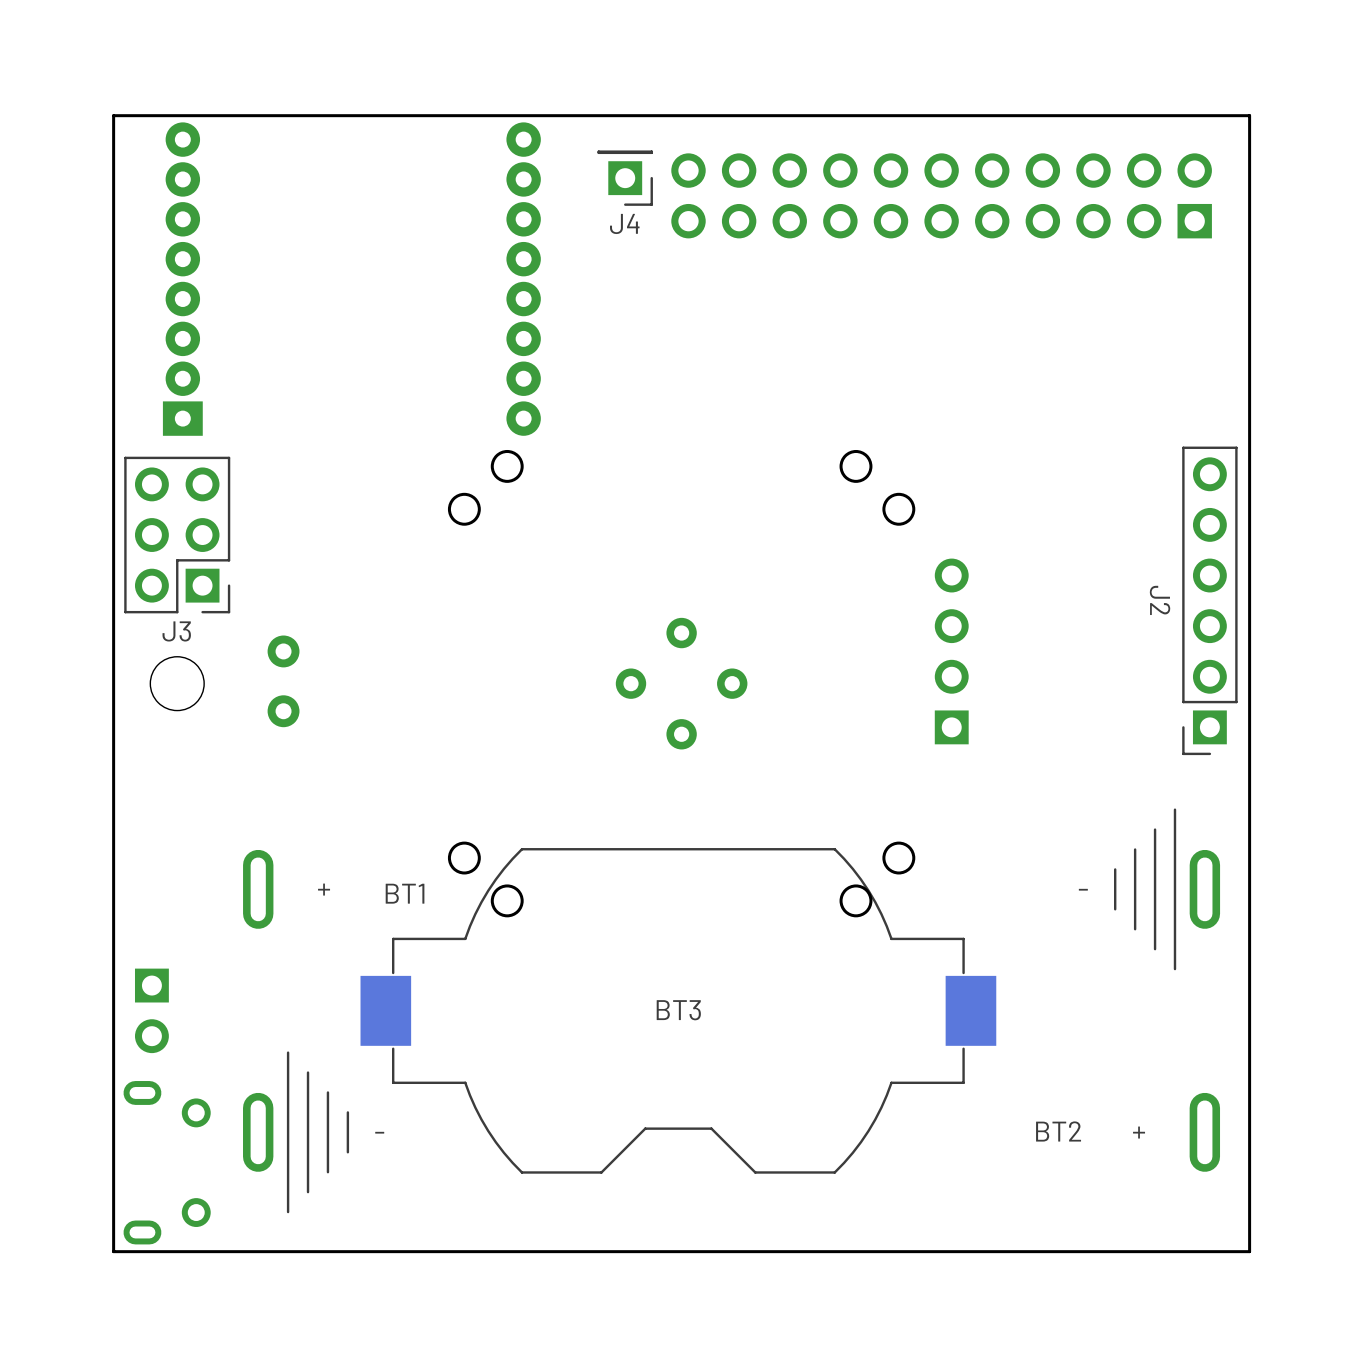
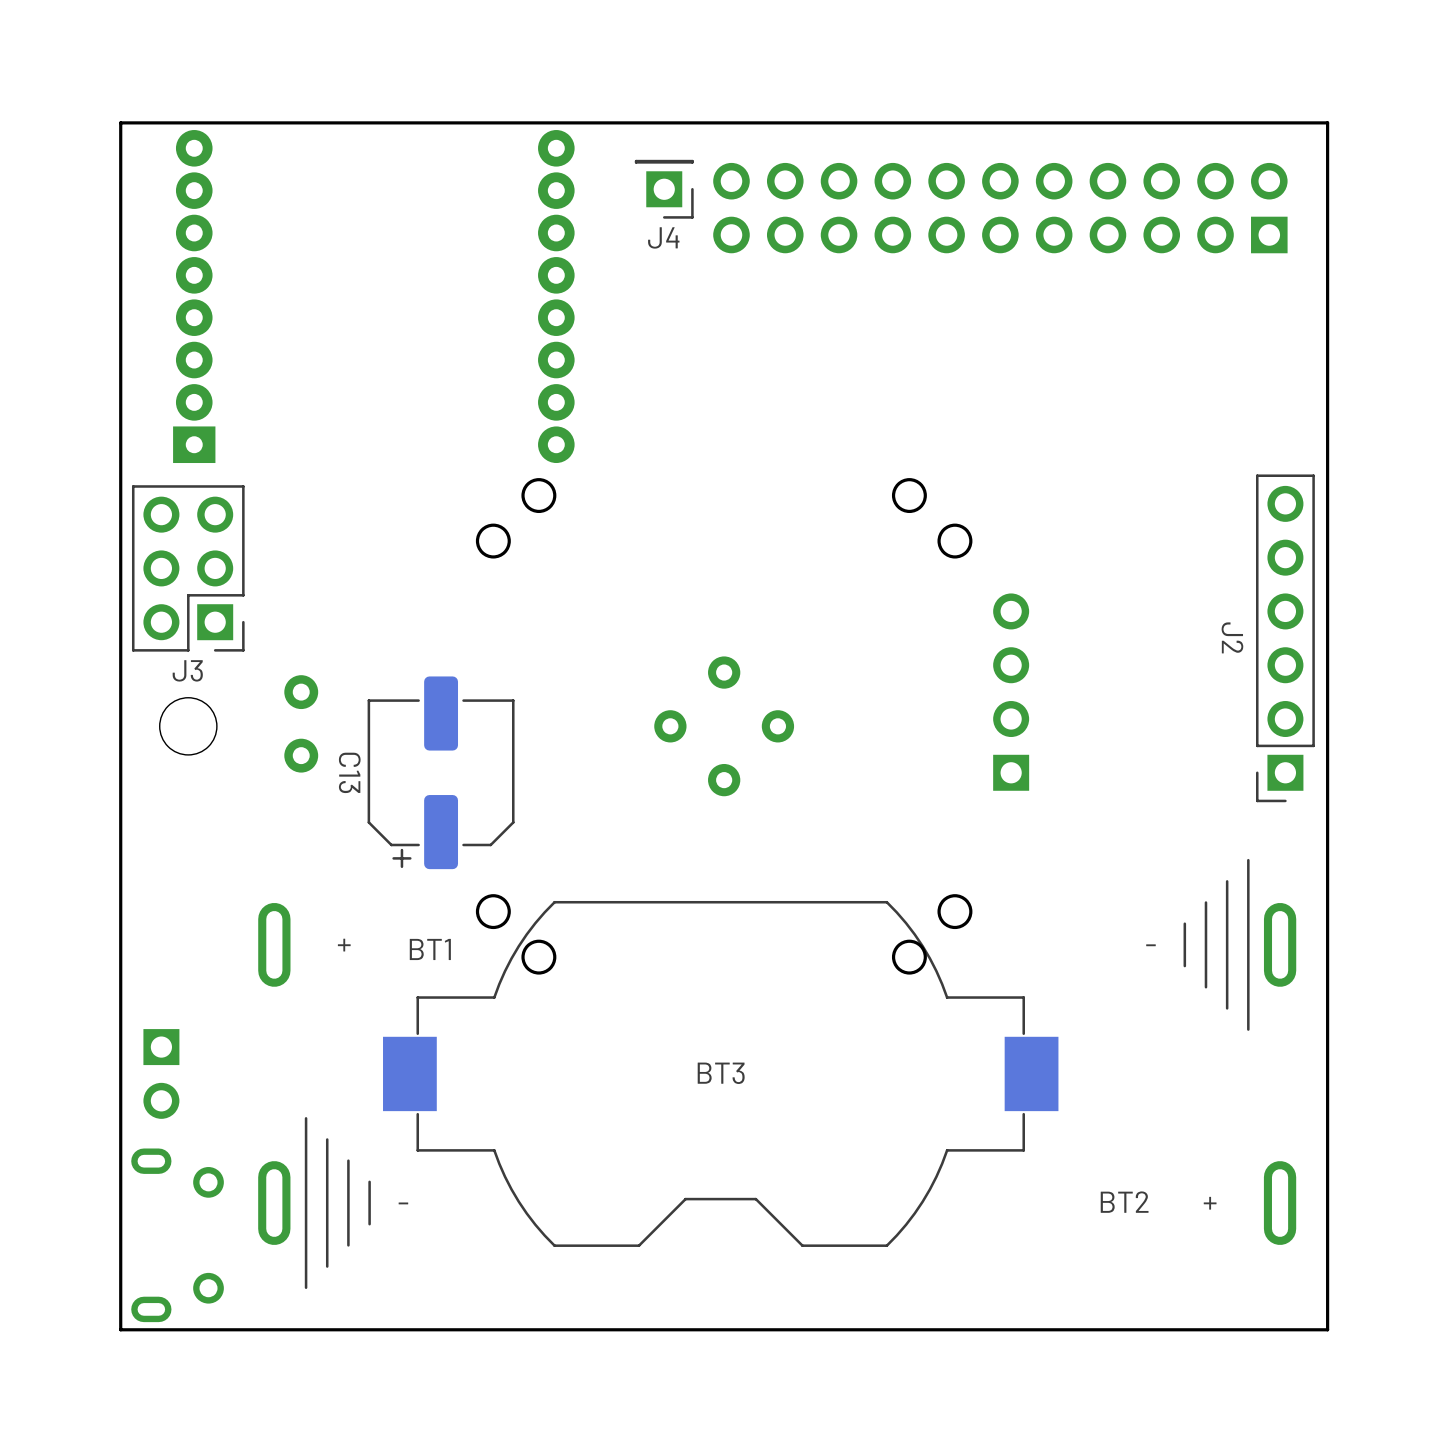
C13: none -> (441, 772)

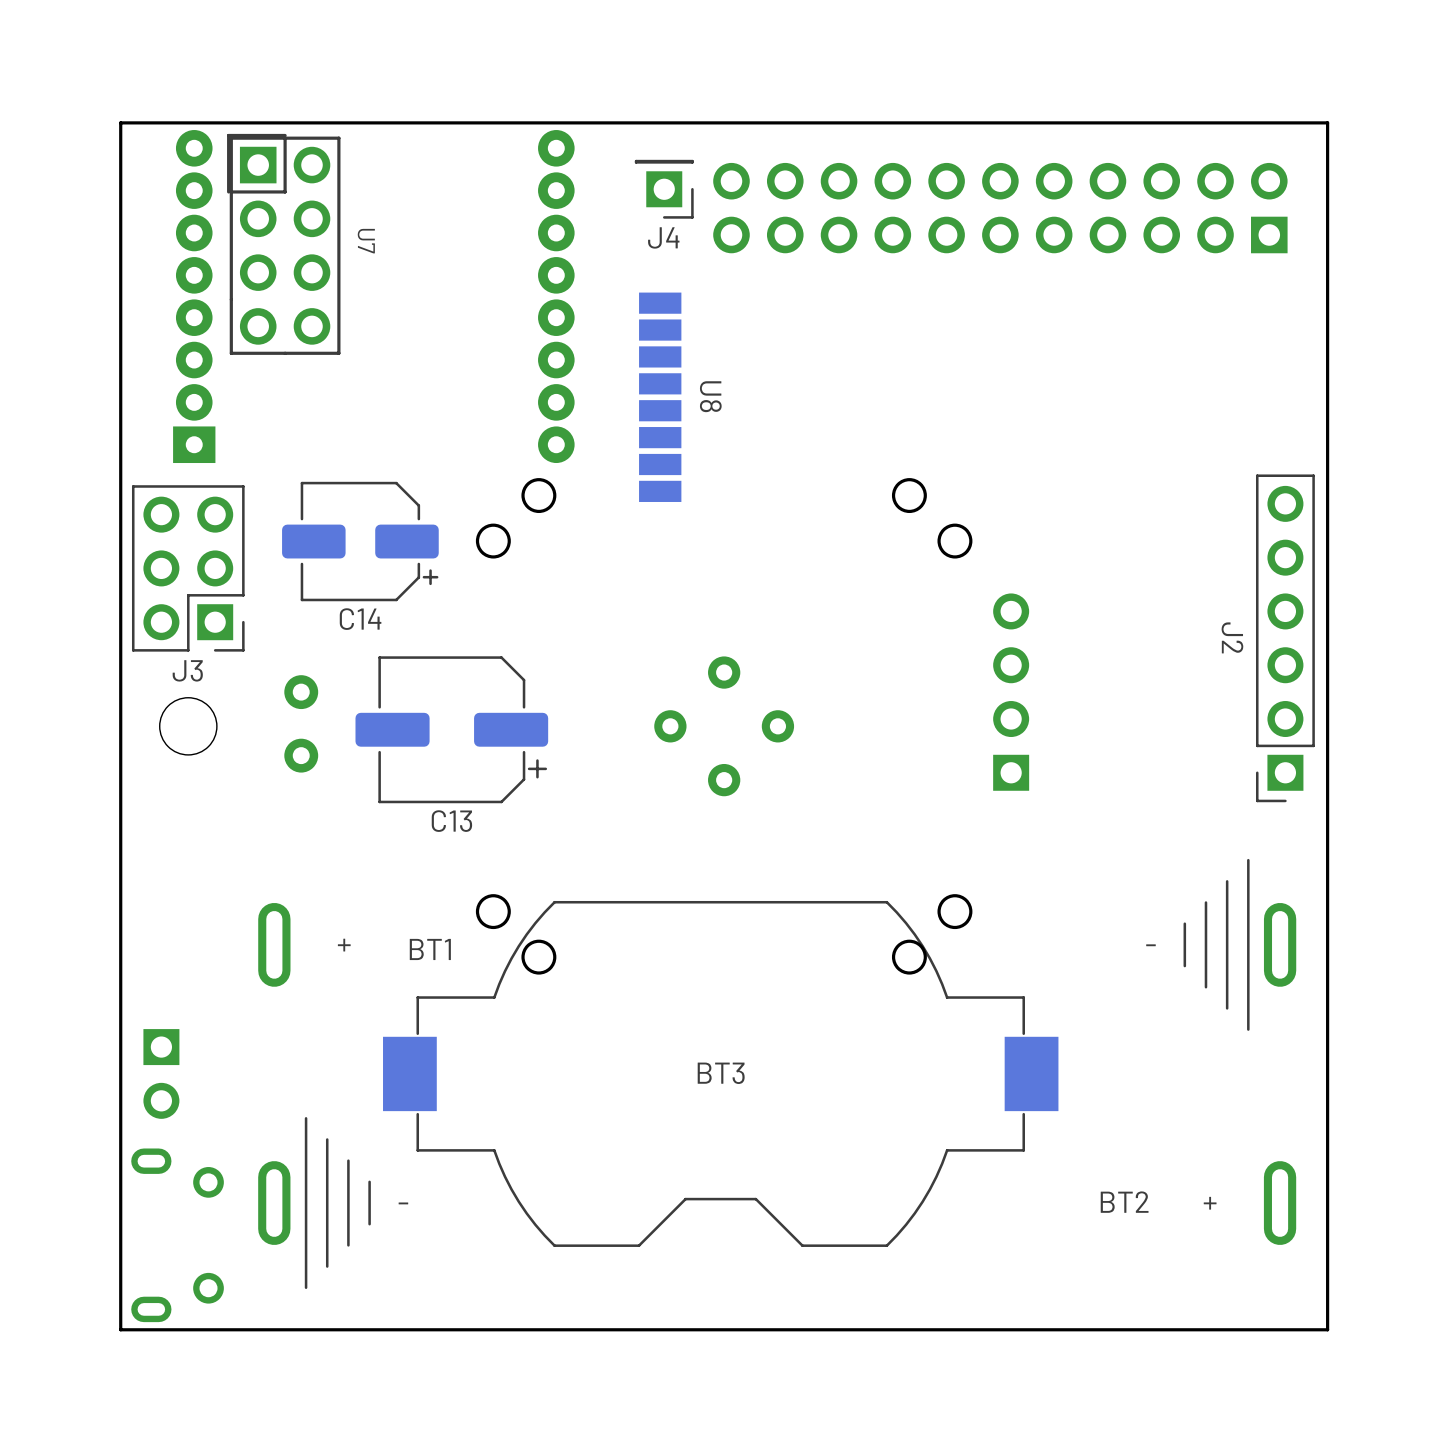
U7: none -> (283, 244)
U8: none -> (660, 397)
C14: none -> (360, 541)
C13 footprint: [367, 676, 515, 870] -> [355, 656, 549, 804]
C13 name position: C13 (349, 772) -> C13 (451, 821)

